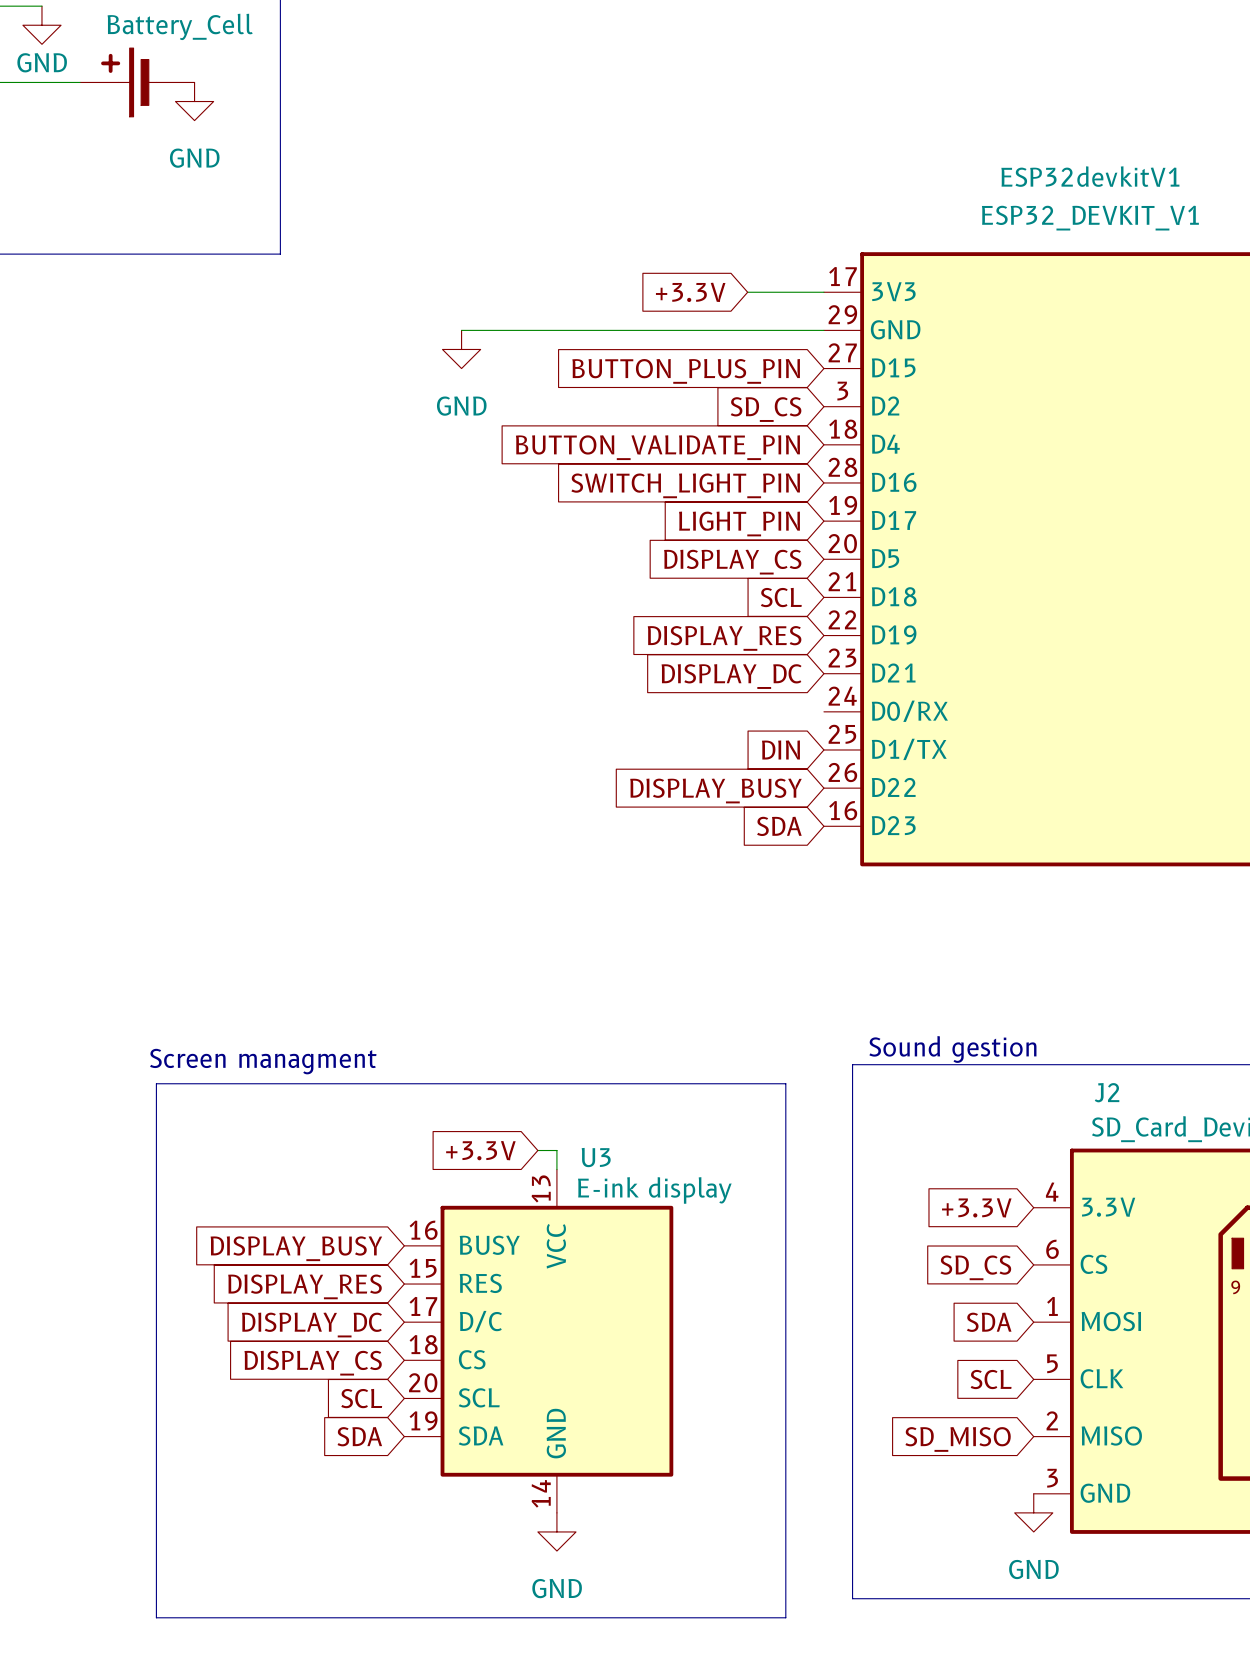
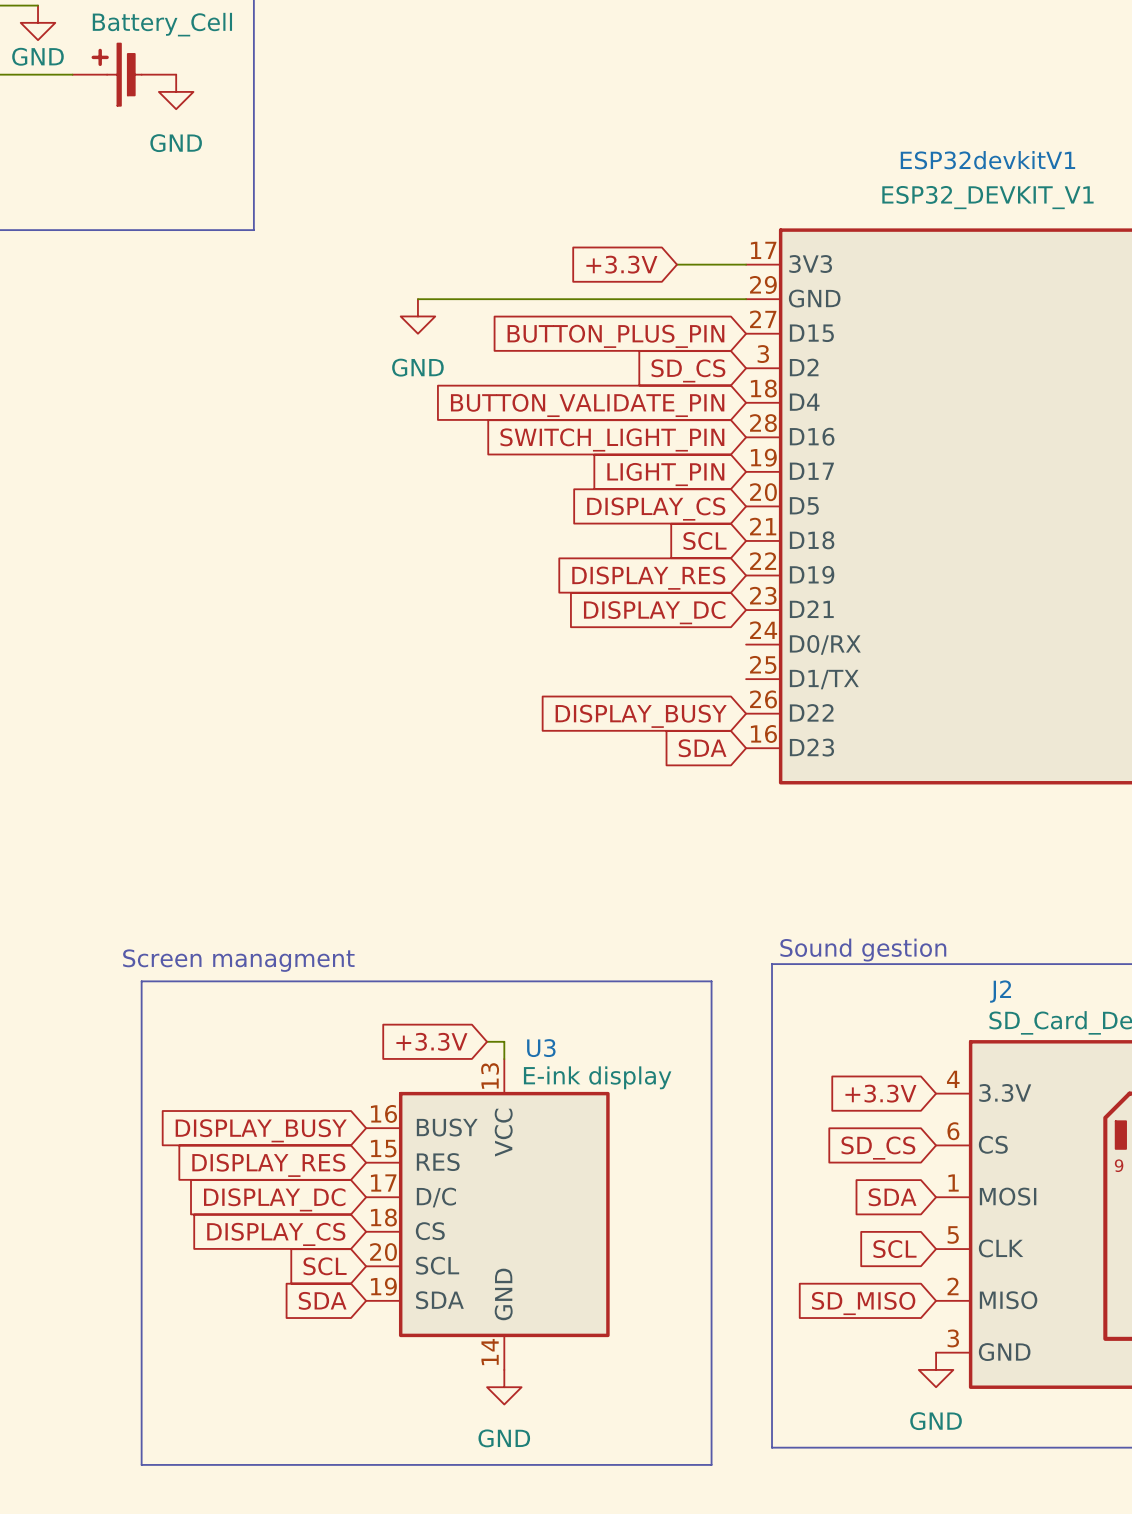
global label: DIN (780, 749) -> none

